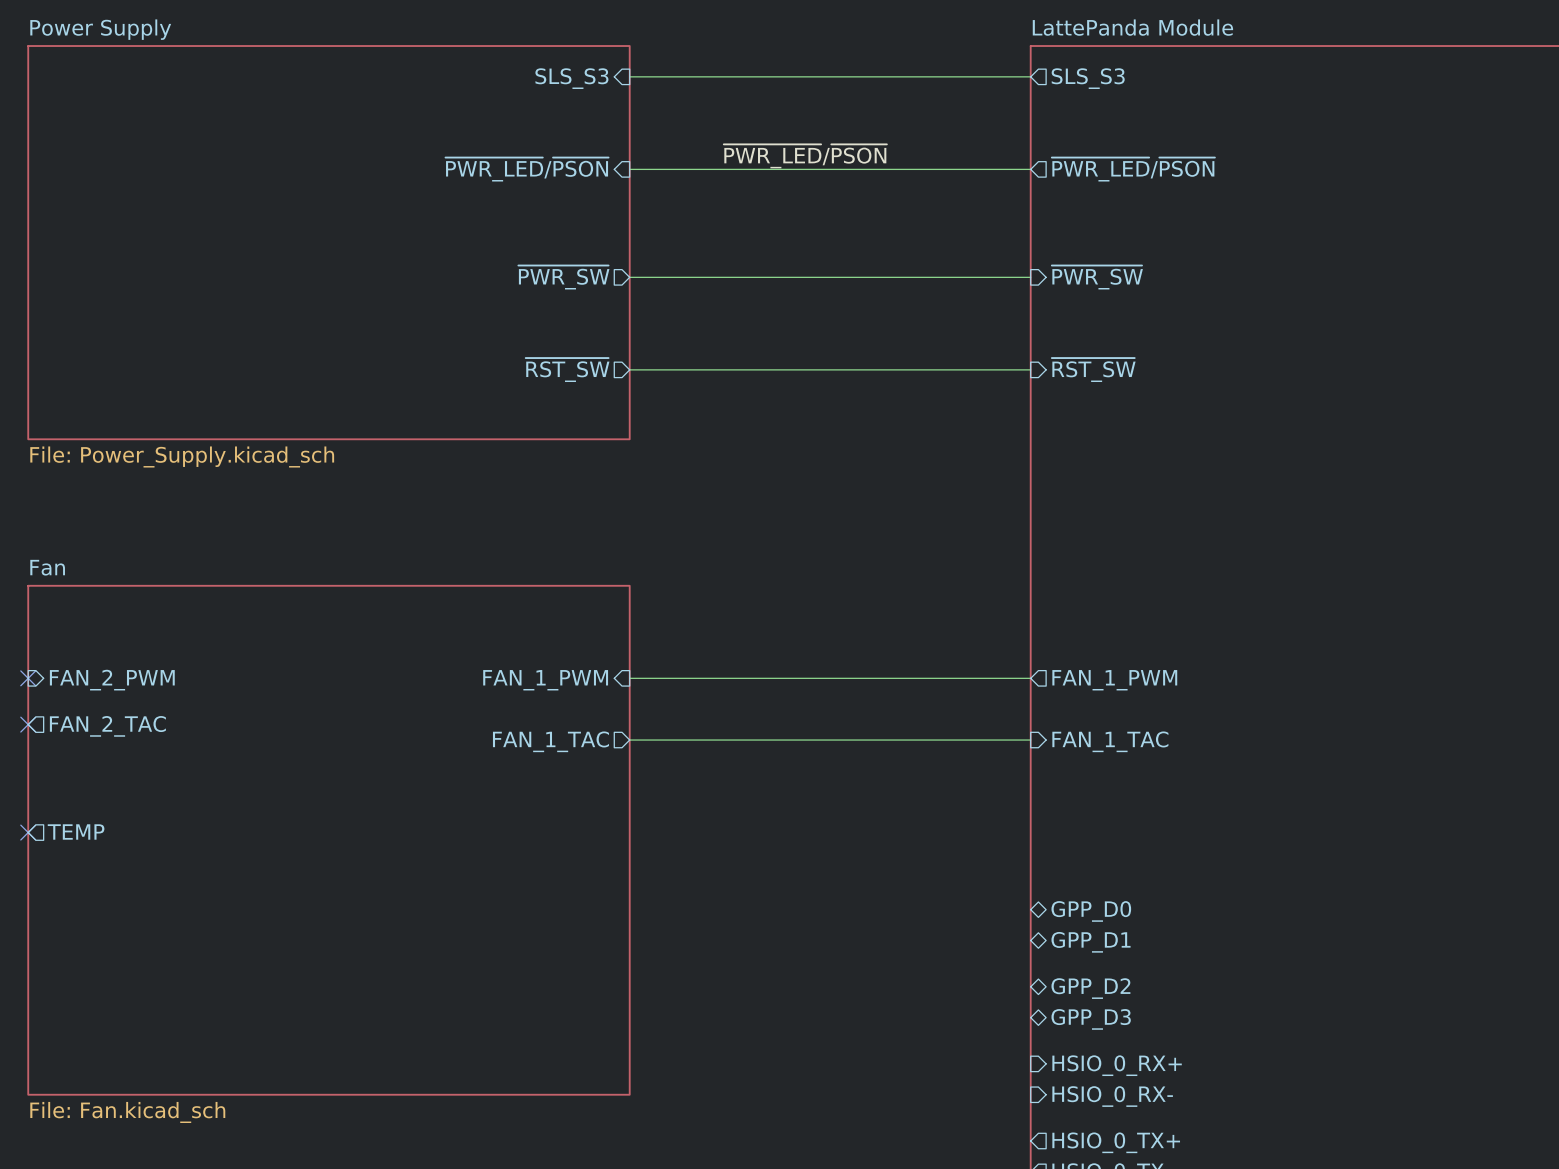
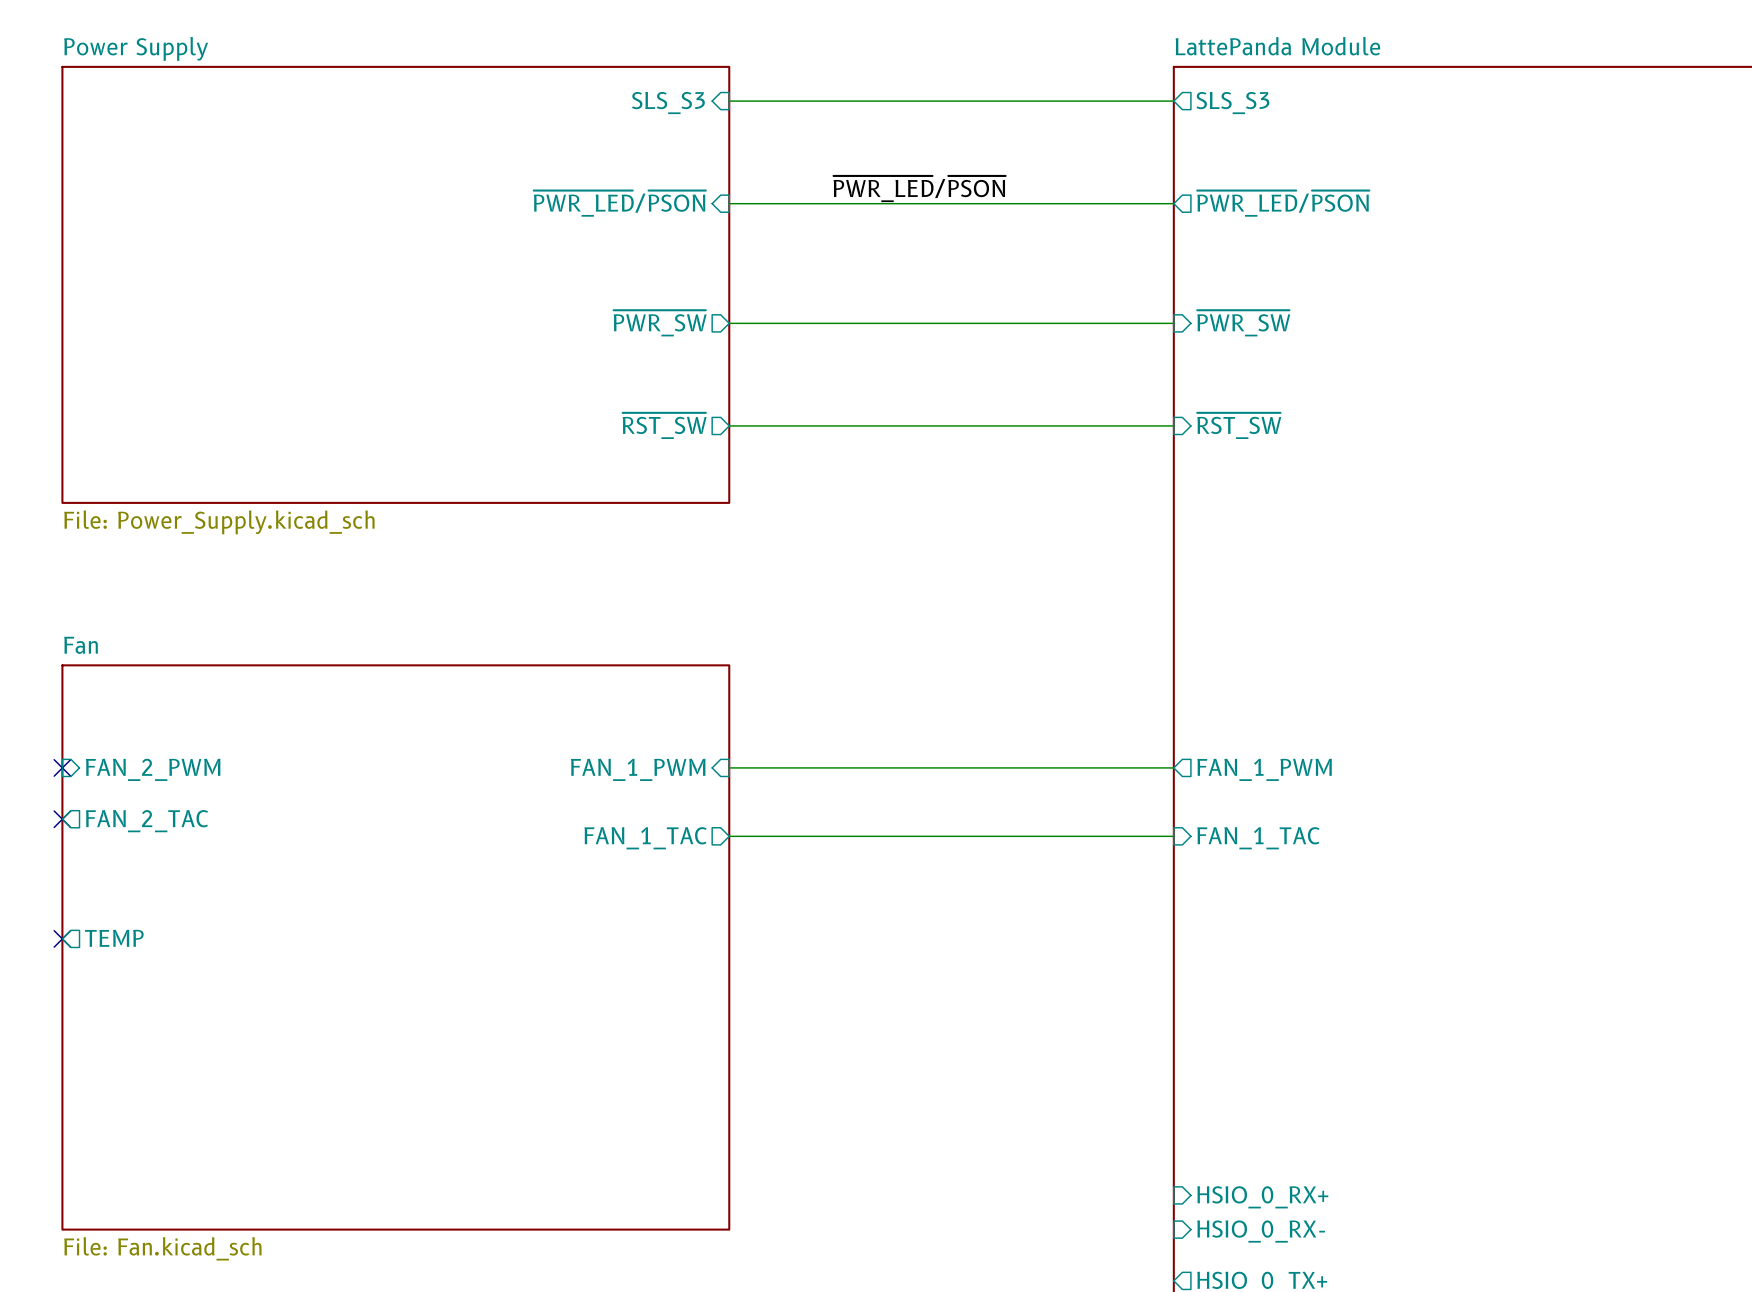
sheet pin: GPP_D0 (1091, 911) -> none
sheet pin: GPP_D1 (1091, 942) -> none
sheet pin: GPP_D2 (1090, 988) -> none
sheet pin: GPP_D3 (1091, 1019) -> none

